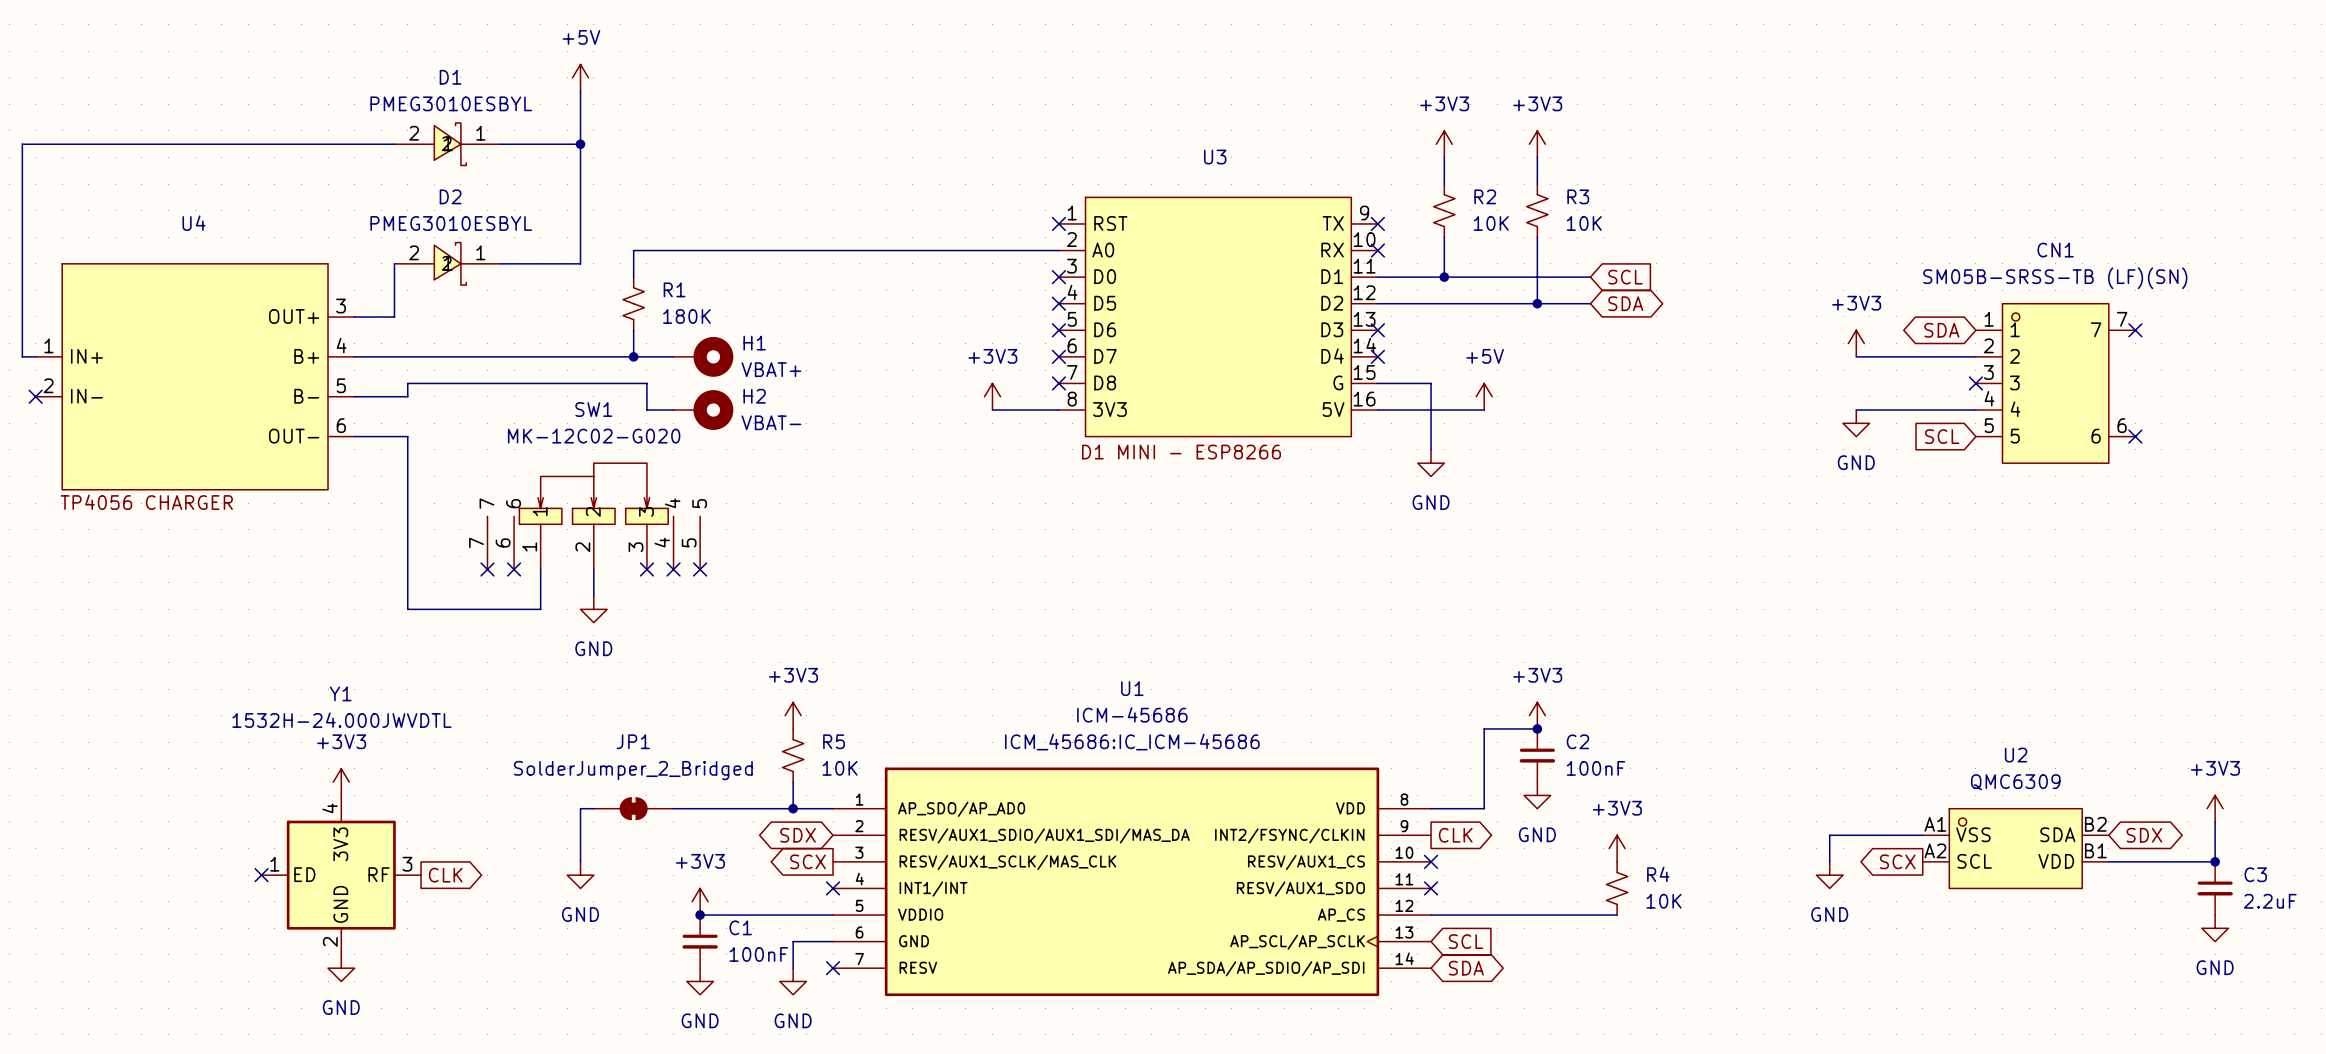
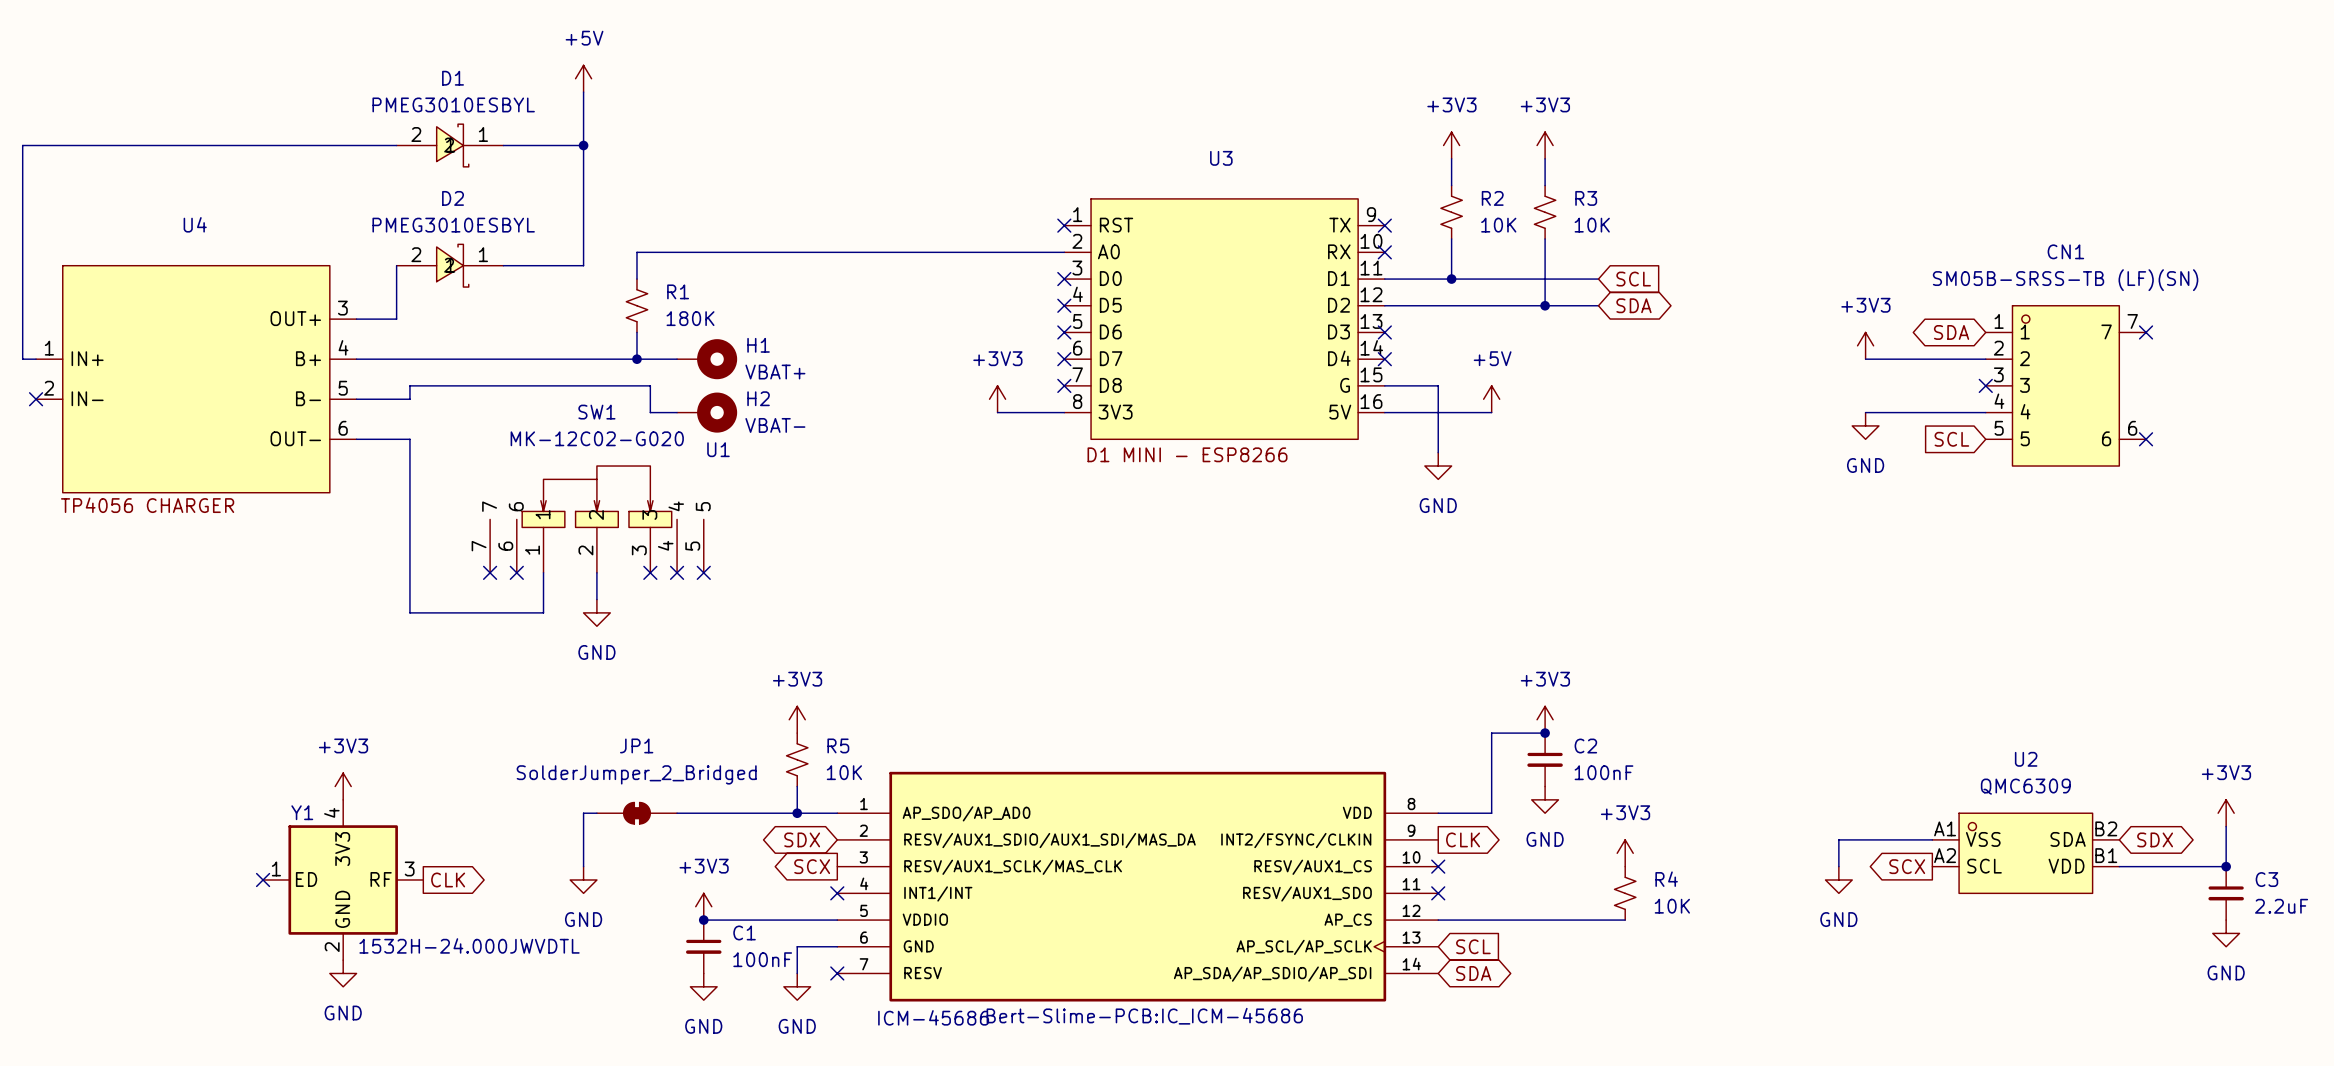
U1 name position: U1 (1132, 688) -> U1 (718, 449)
Y1 name position: Y1 (340, 693) -> Y1 (302, 812)
U1 value position: ICM-45686 (1132, 714) -> ICM-45686 (933, 1017)
Y1 value position: 1532H-24.000JWVDTL (341, 720) -> 1532H-24.000JWVDTL (469, 945)
U1 text: ICM_45686:IC_ICM-45686 (1132, 742) -> Bert-Slime-PCB:IC_ICM-45686 (1144, 1016)

